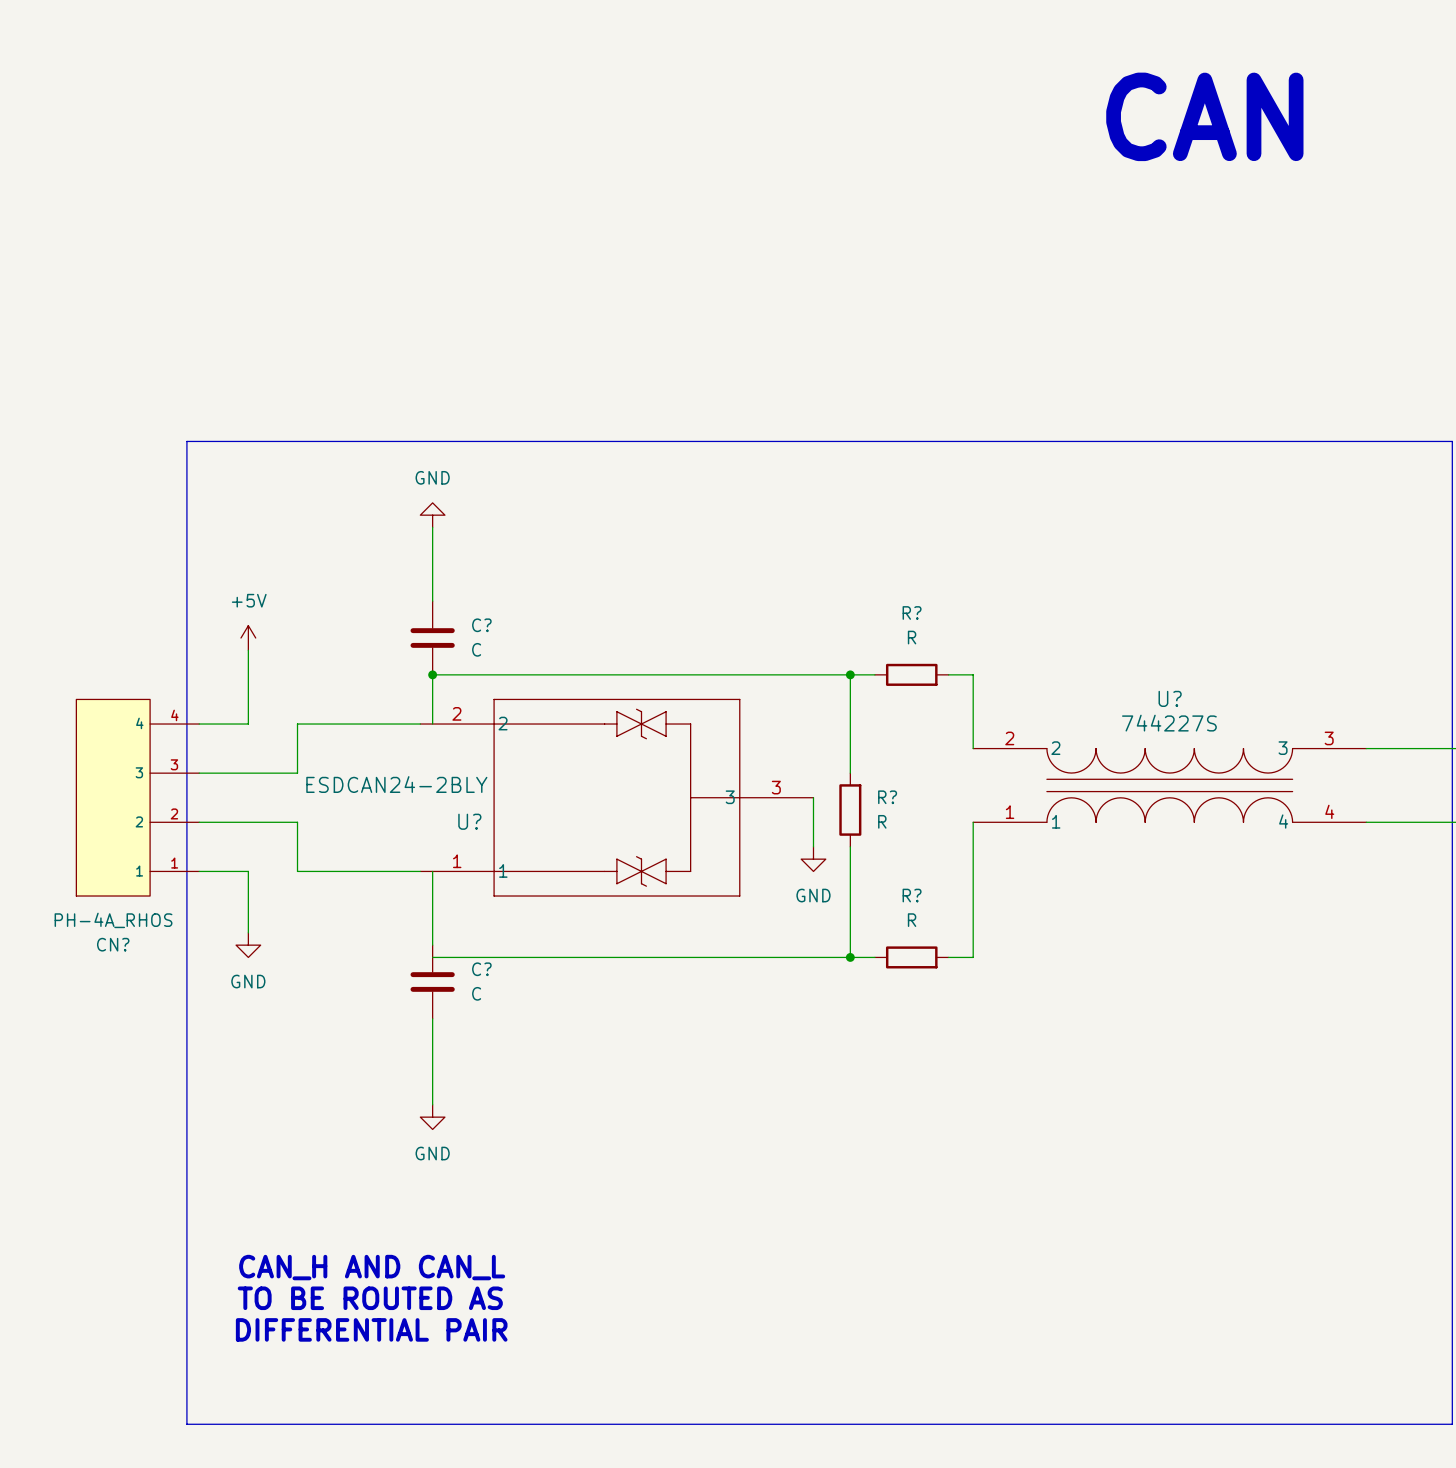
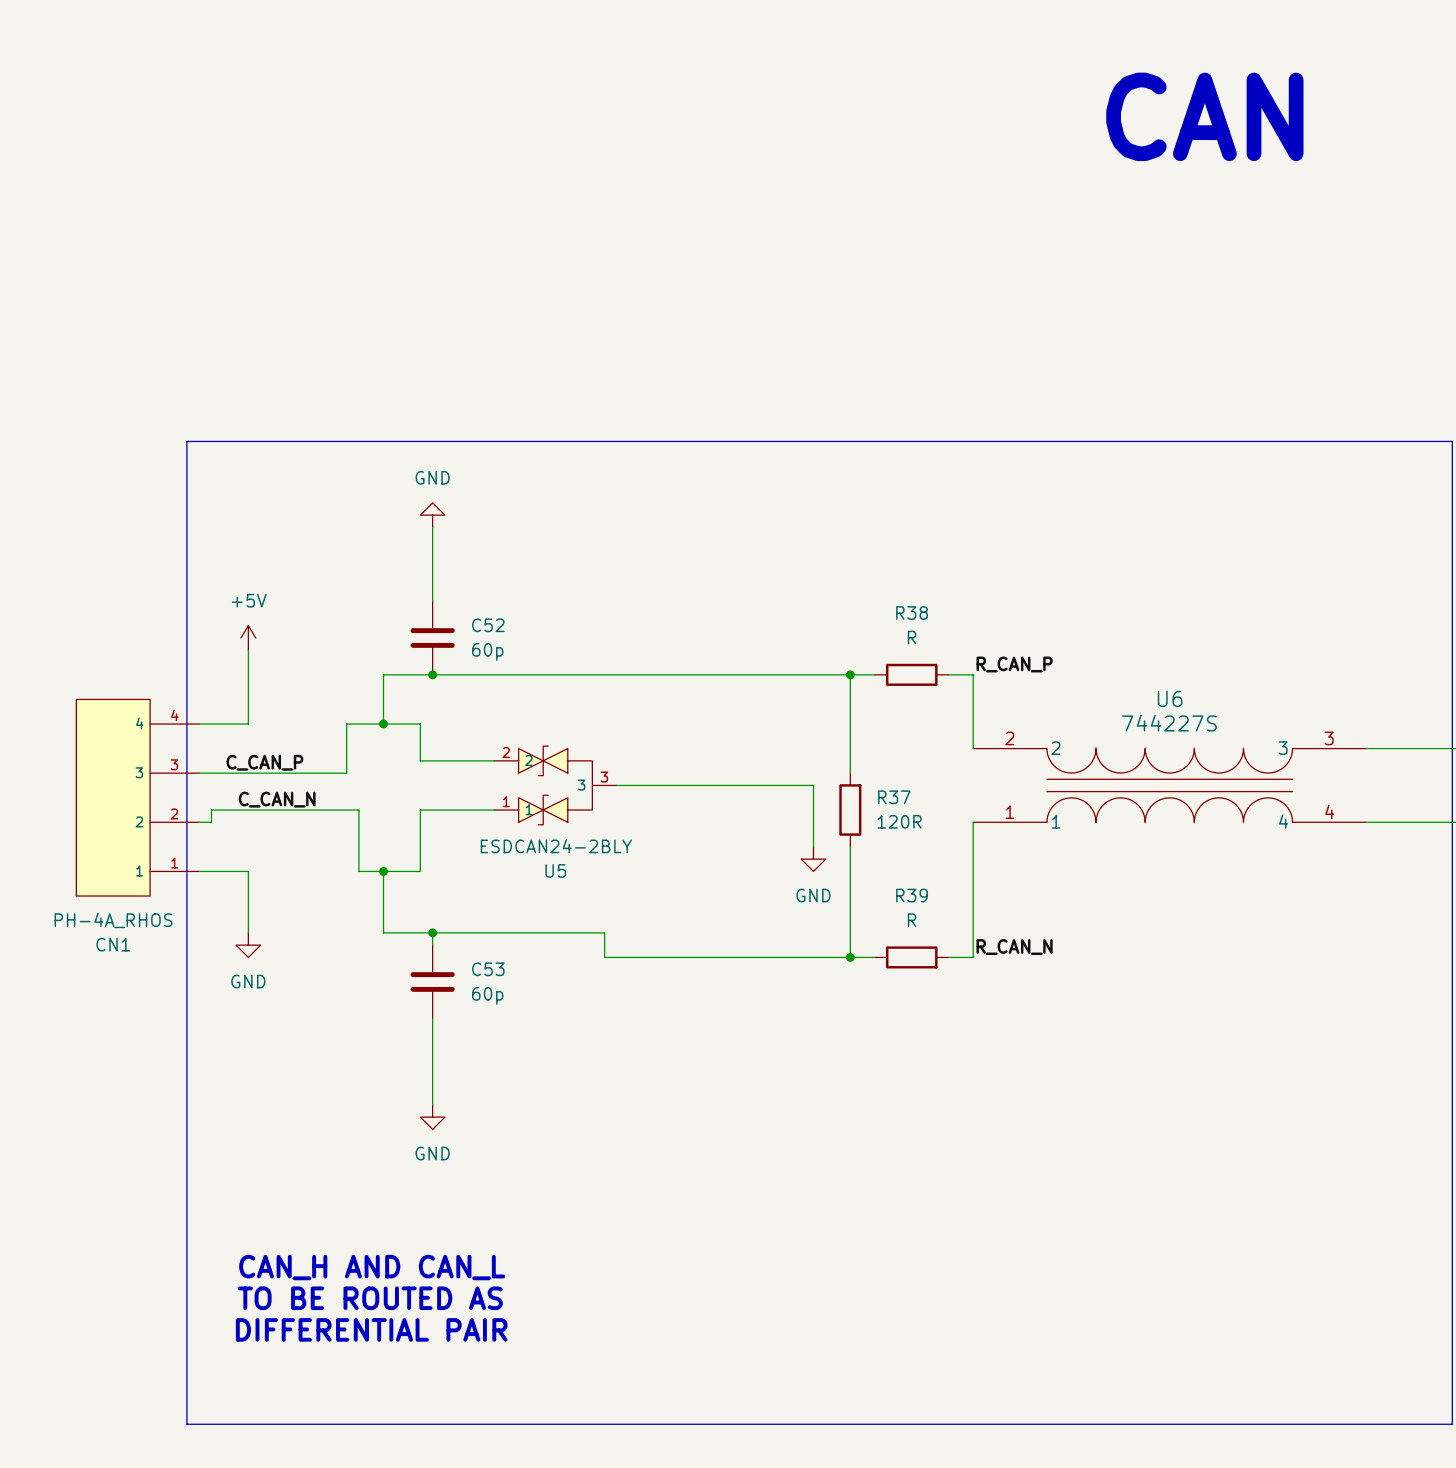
R? name: R? (912, 612) -> R38 (912, 612)
C? name: C? (481, 625) -> C52 (488, 625)
C? value: C (476, 649) -> 60p (487, 651)
label: none -> R_CAN_P (1014, 664)
wire: (432, 674) (432, 724) -> (432, 674) (383, 674) (383, 724)
U? name: U? (1170, 698) -> U6 (1170, 698)
wire: (346, 724) (297, 724) (297, 773) -> (346, 724) (346, 773) (297, 773)
junction: none -> (383, 724)
wire: none -> (420, 724) (420, 760) (494, 760)
label: none -> C_CAN_P (264, 762)
U5: none -> ESDCAN24-2BLY (555, 785)
wire: none -> (616, 785) (813, 785) (813, 797)
U?: ESDCAN24-2BLY (616, 797) -> none
R? name: R? (887, 797) -> R37 (894, 797)
label: none -> C_CAN_N (277, 799)
wire: none -> (494, 810) (420, 810) (420, 871)
R? value: R (882, 821) -> 120R (899, 821)
wire: (211, 822) (297, 822) (297, 871) (358, 871) -> (211, 822) (211, 810) (358, 810) (358, 871)
junction: none -> (383, 871)
wire: (432, 871) (432, 932) -> none
R? name: R? (912, 895) -> R39 (912, 895)
junction: none -> (432, 932)
CN? name: CN? (113, 944) -> CN1 (113, 944)
label: none -> R_CAN_N (1014, 947)
wire: (432, 957) (604, 957) -> (383, 871) (383, 932) (604, 932) (604, 957)
C? name: C? (481, 969) -> C53 (488, 969)
C? value: C (476, 993) -> 60p (487, 995)

